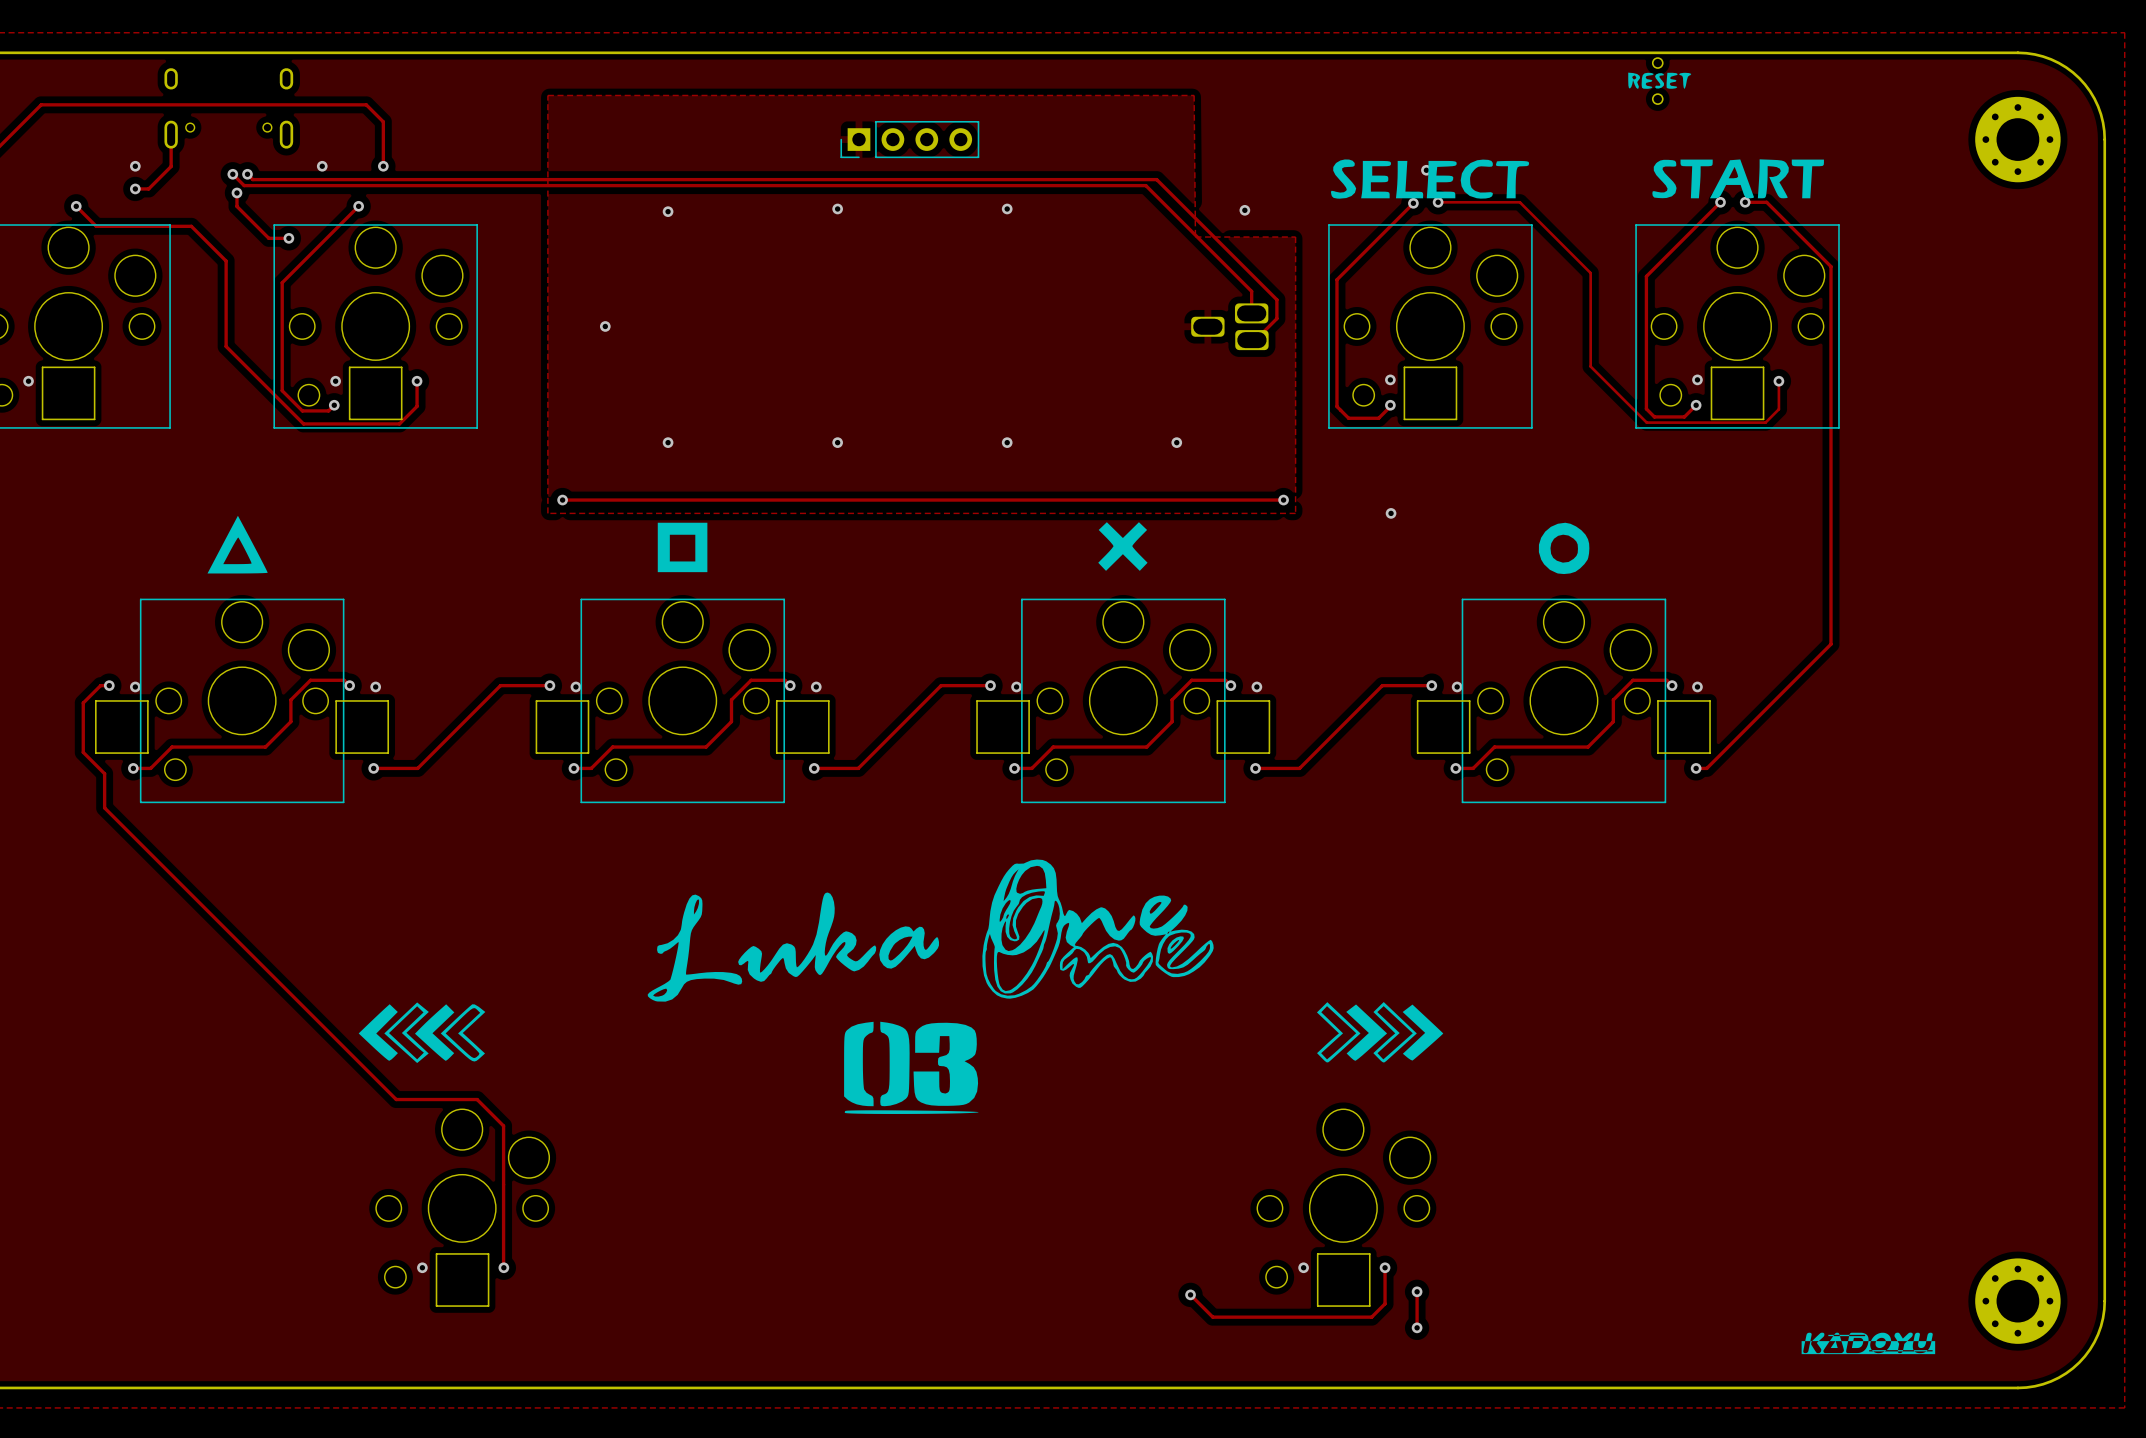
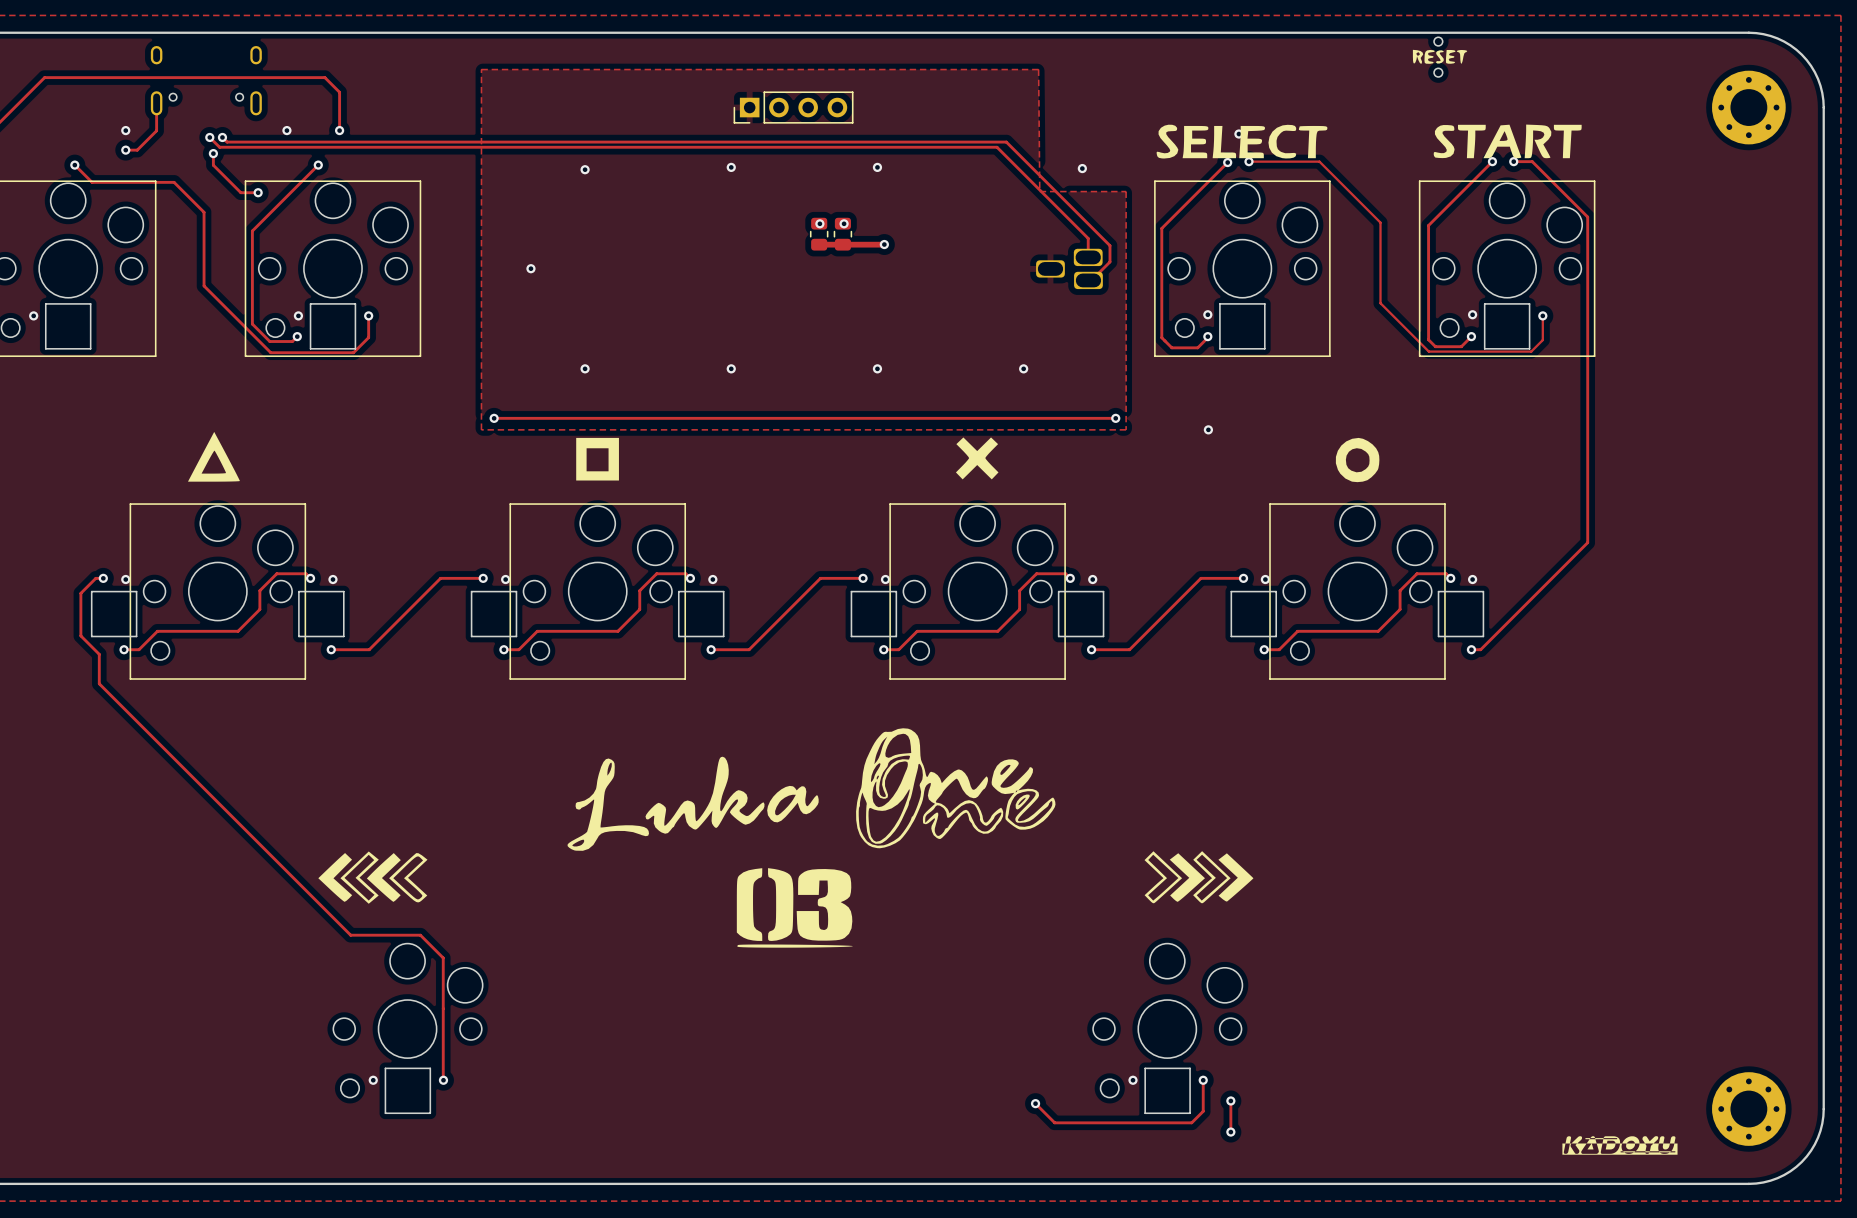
via: none -> (819, 223)
via: none -> (844, 223)
part: none -> (819, 234)
part: none -> (842, 234)
track: none -> (819, 244) (884, 244)
via: none -> (884, 244)

